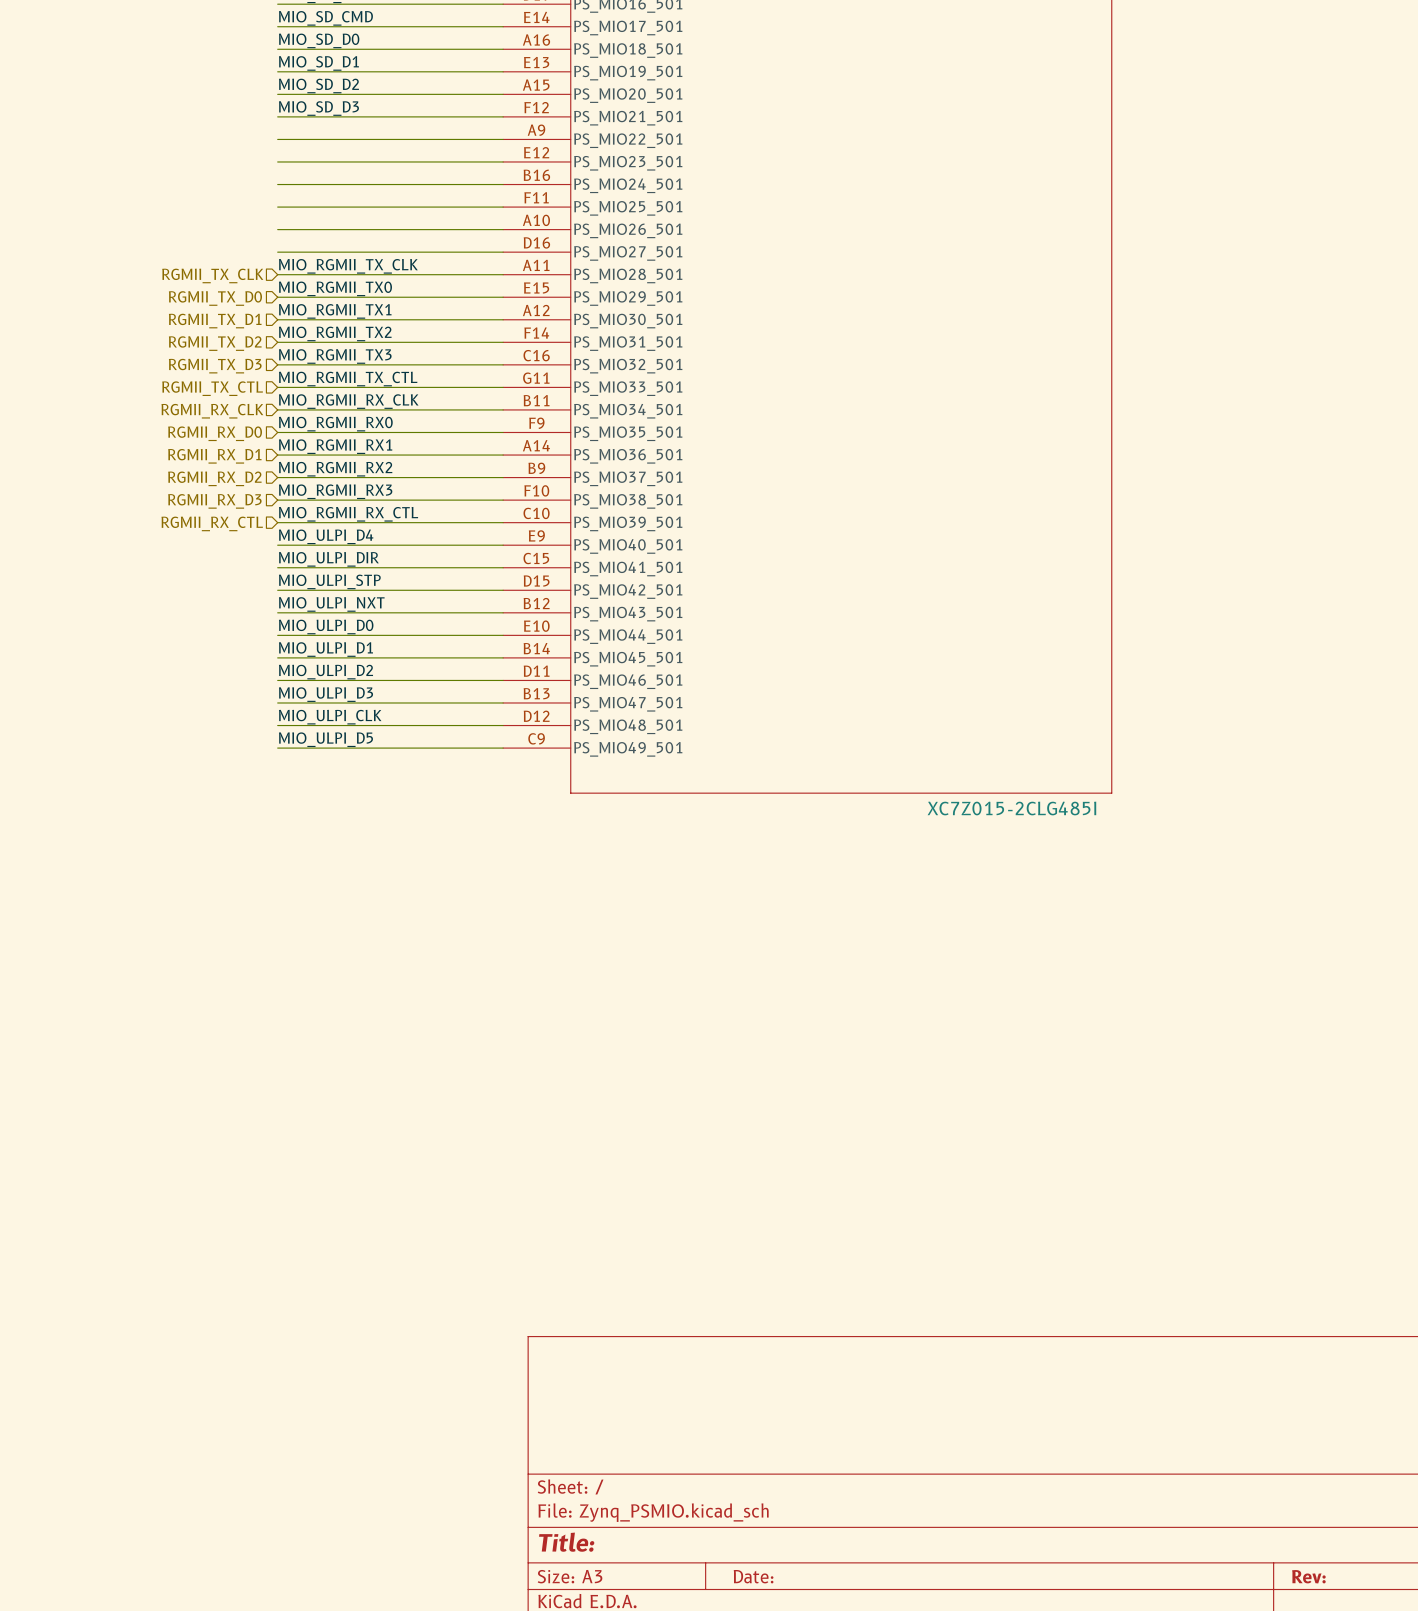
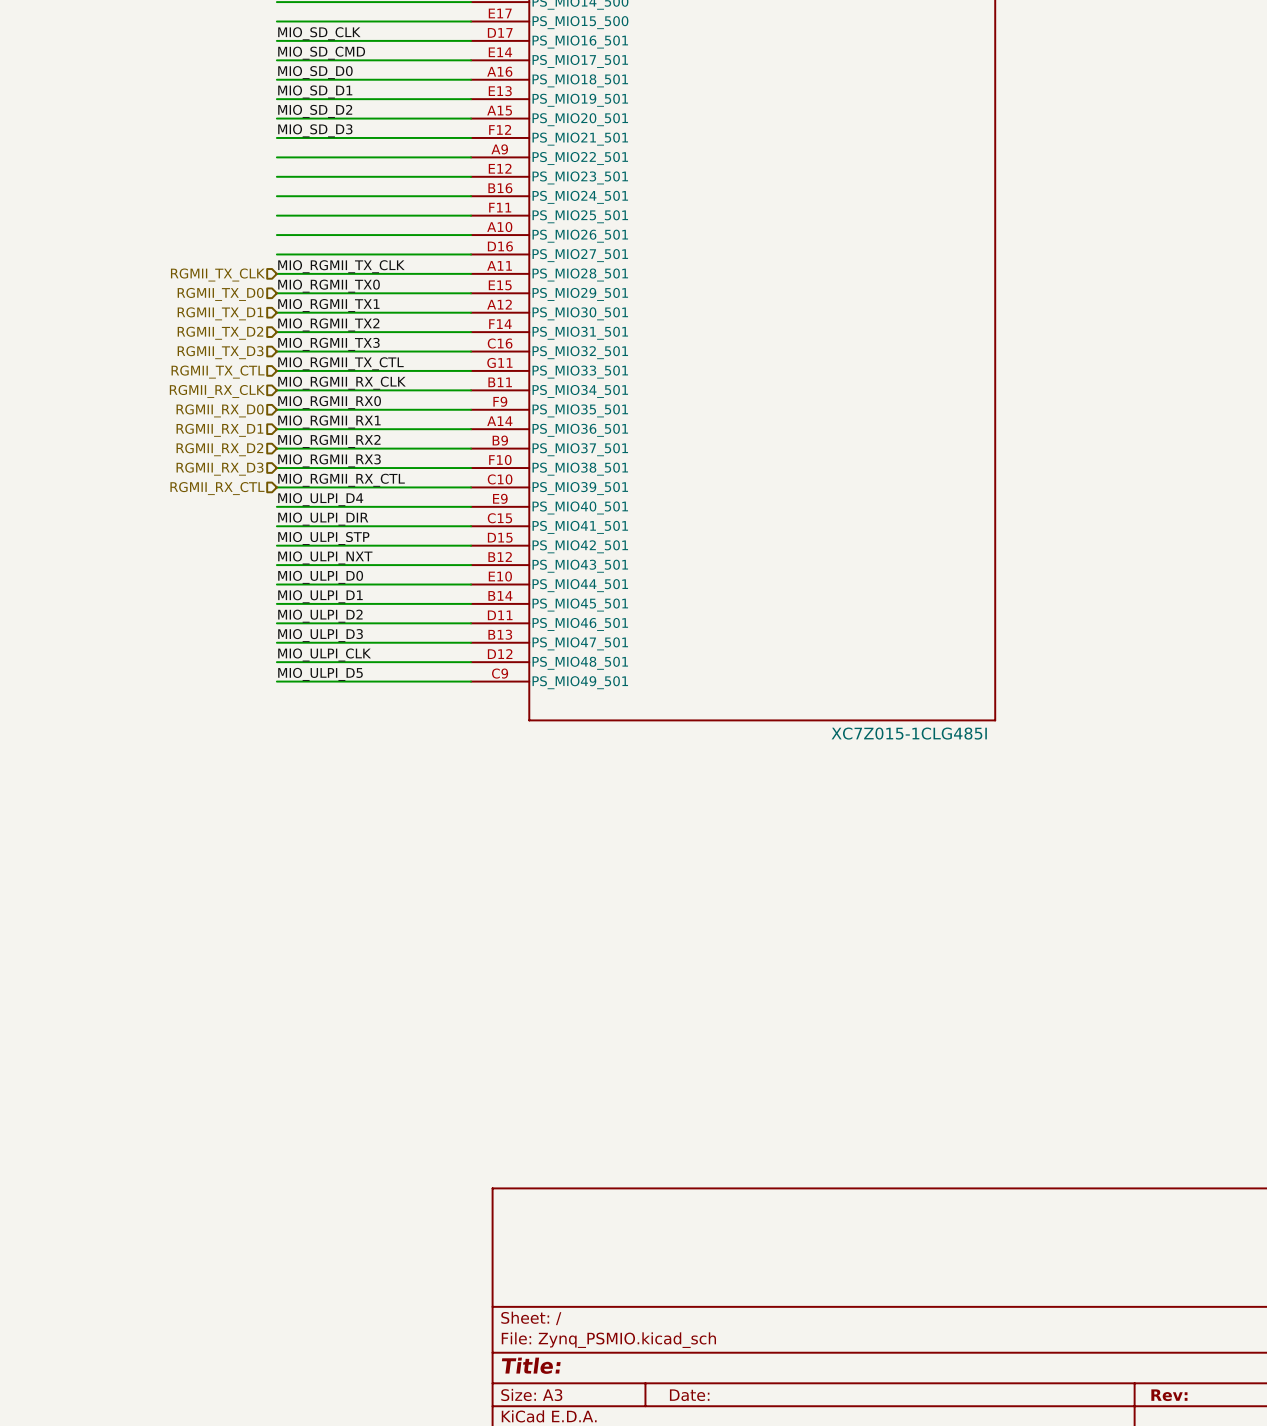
part value: XC7Z015-2CLG485I (1011, 808) -> XC7Z015-1CLG485I (909, 733)

